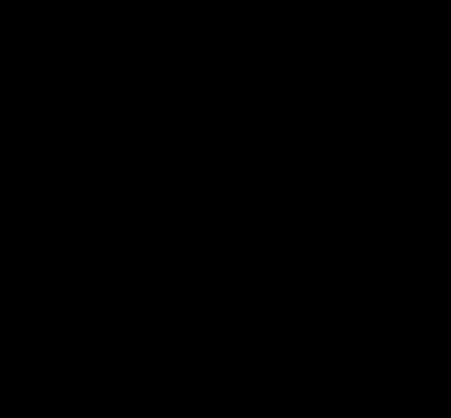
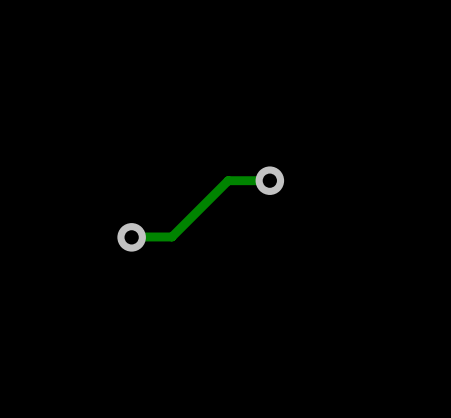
track: none -> (269, 180) (228, 180) (171, 236) (132, 236)
via: none -> (269, 180)
via: none -> (131, 237)

